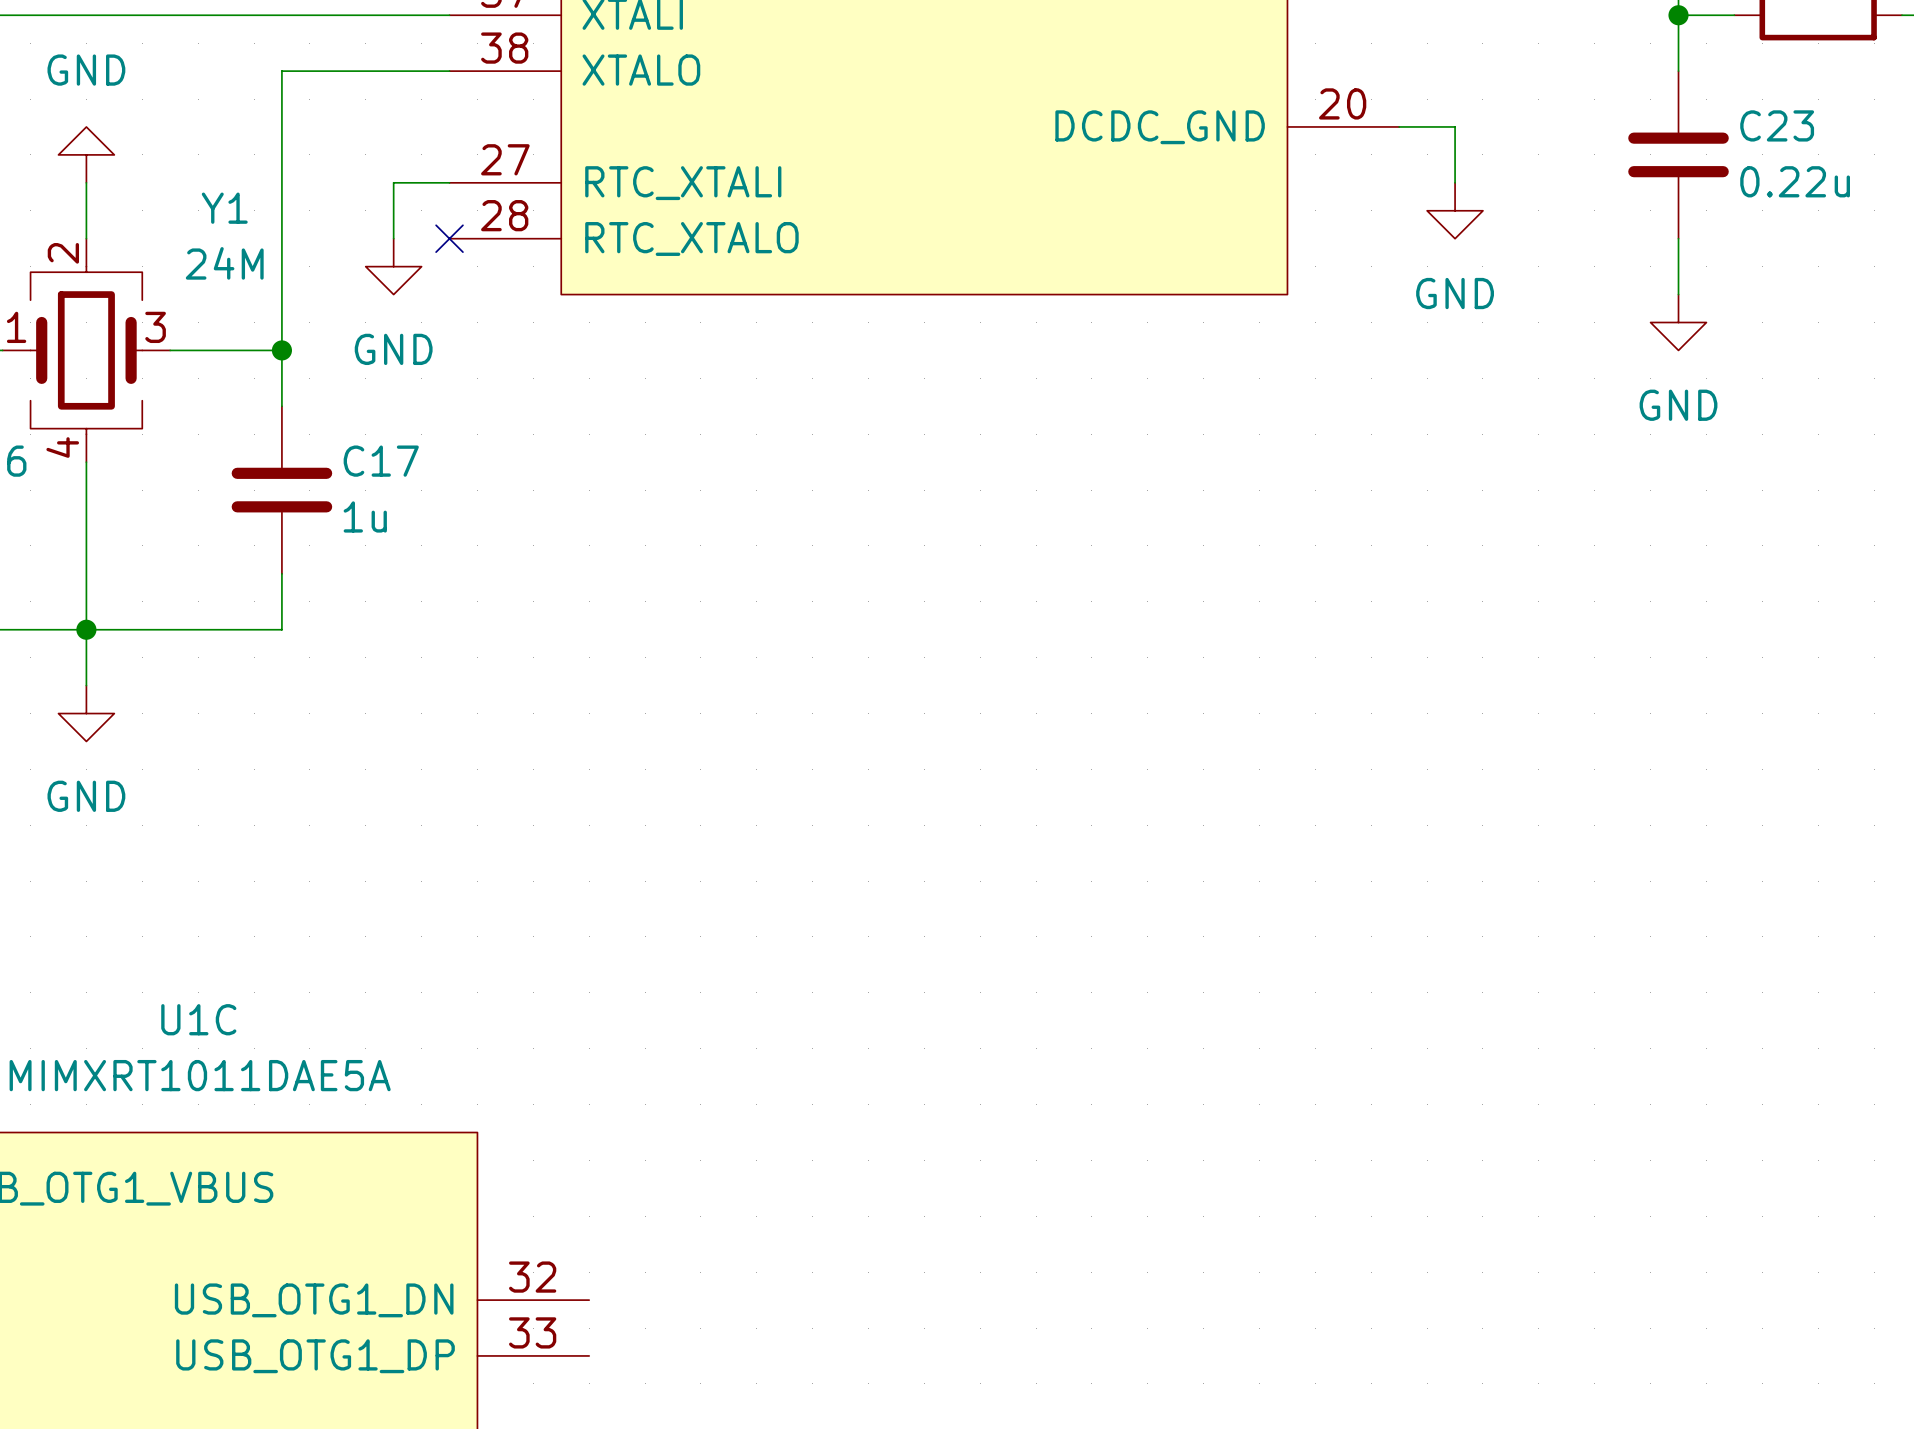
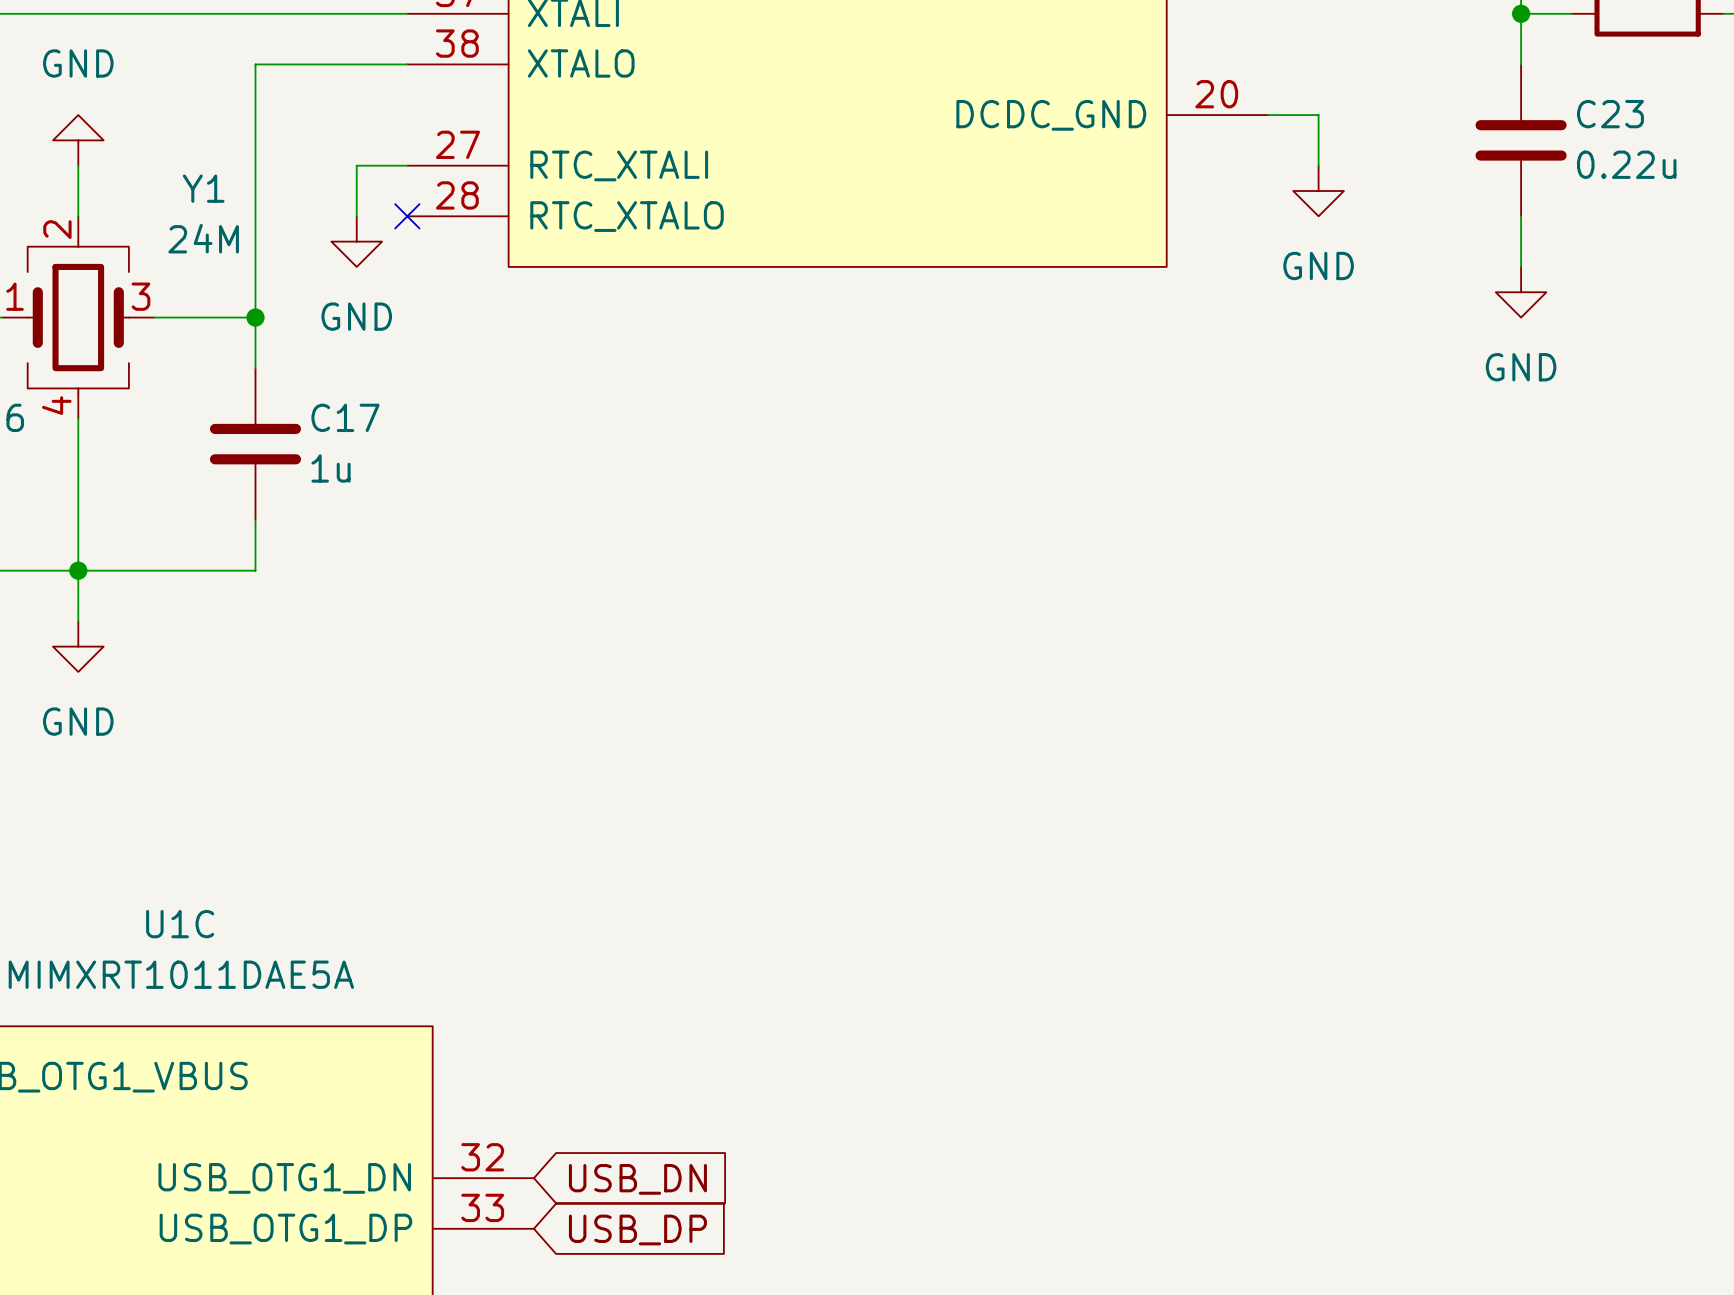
global label: none -> USB_DN (637, 1179)
global label: none -> USB_DP (637, 1229)

